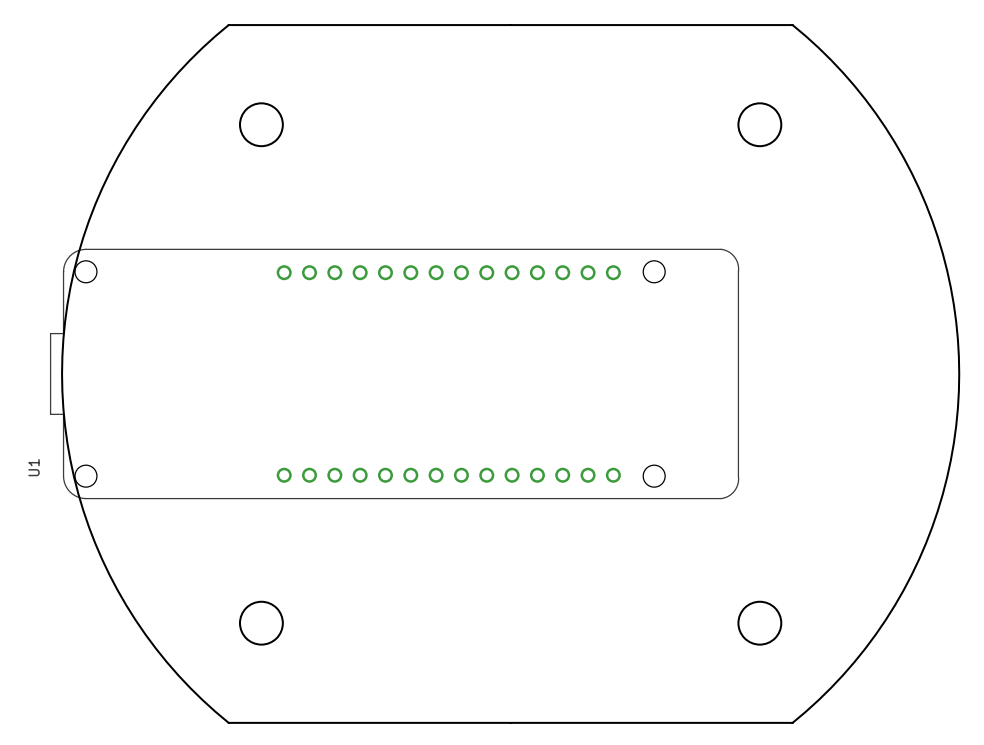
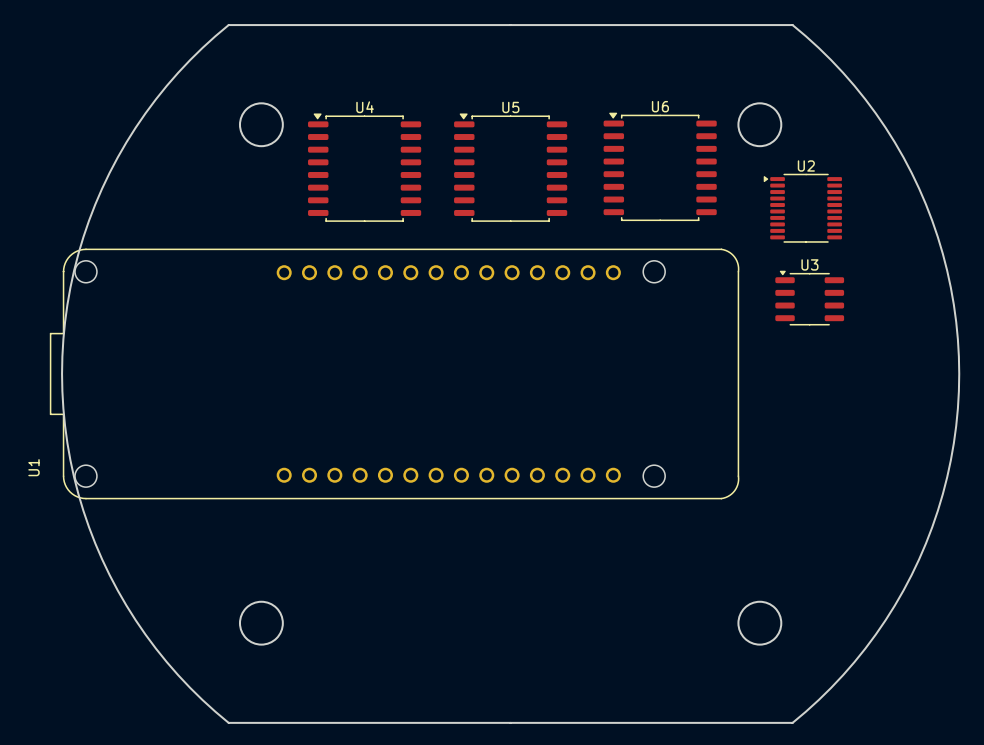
U6: none -> (660, 166)
U4: none -> (364, 167)
U5: none -> (510, 167)
U2: none -> (802, 208)
U3: none -> (809, 298)

